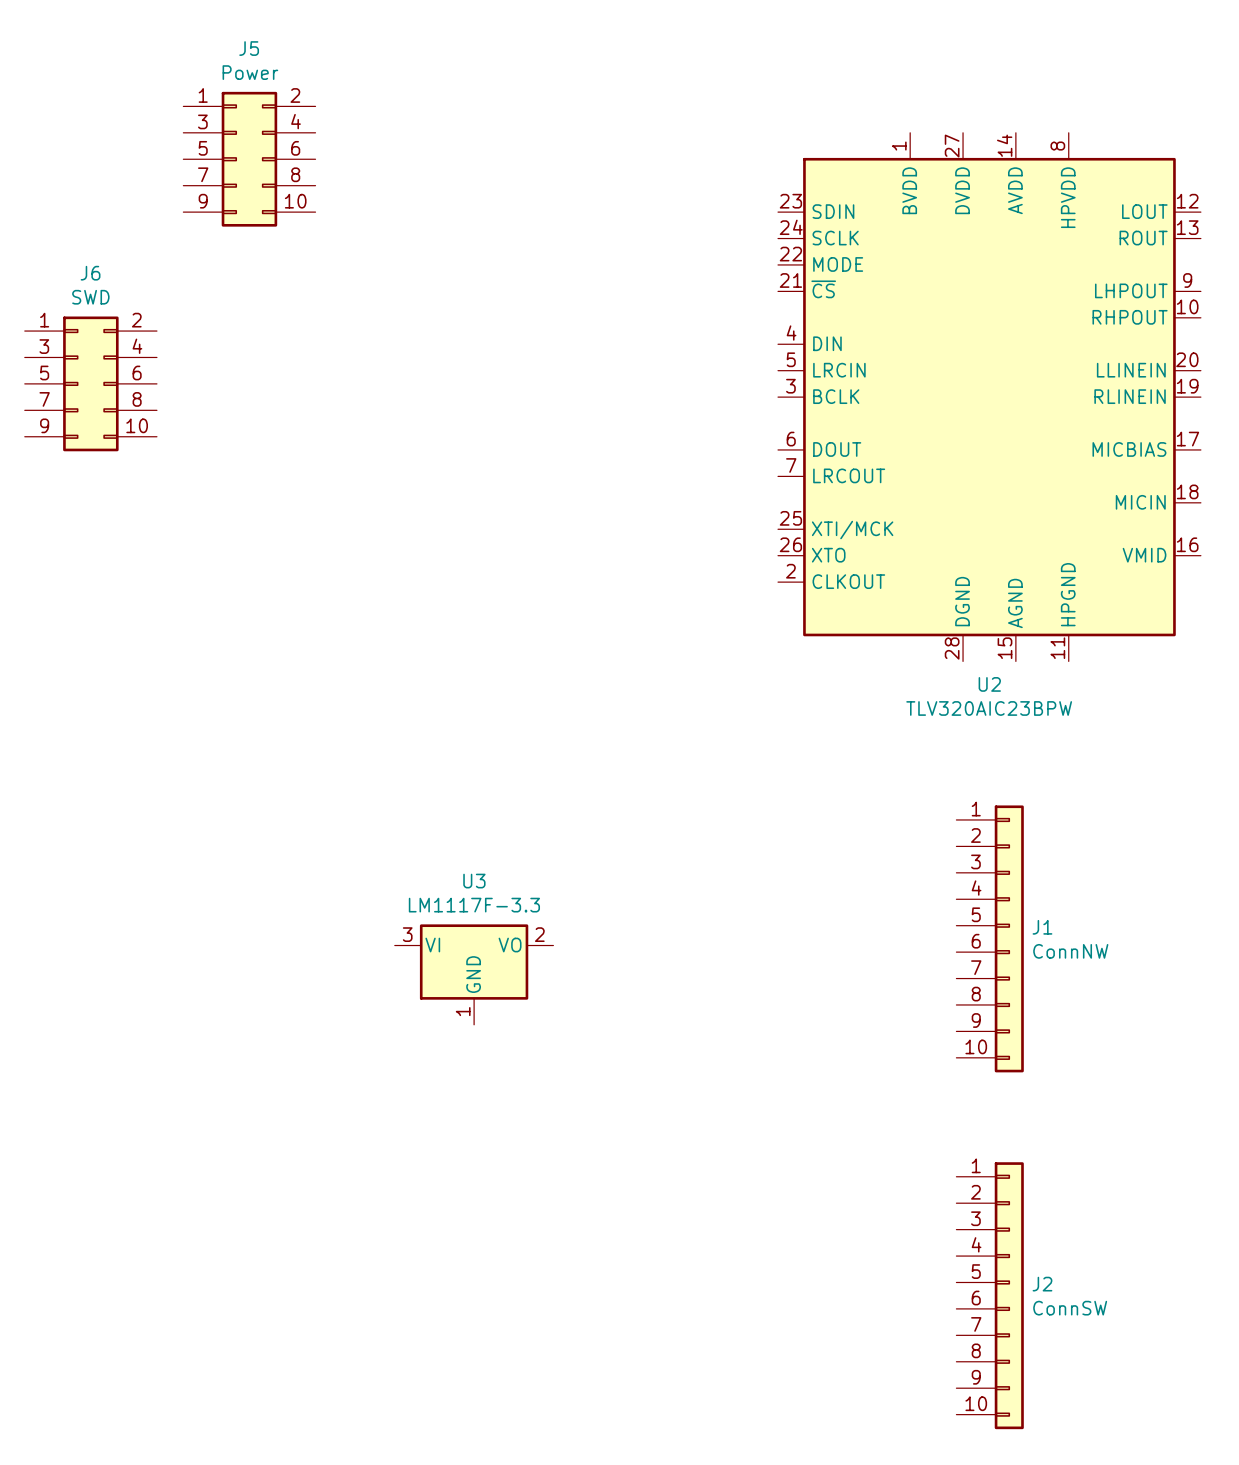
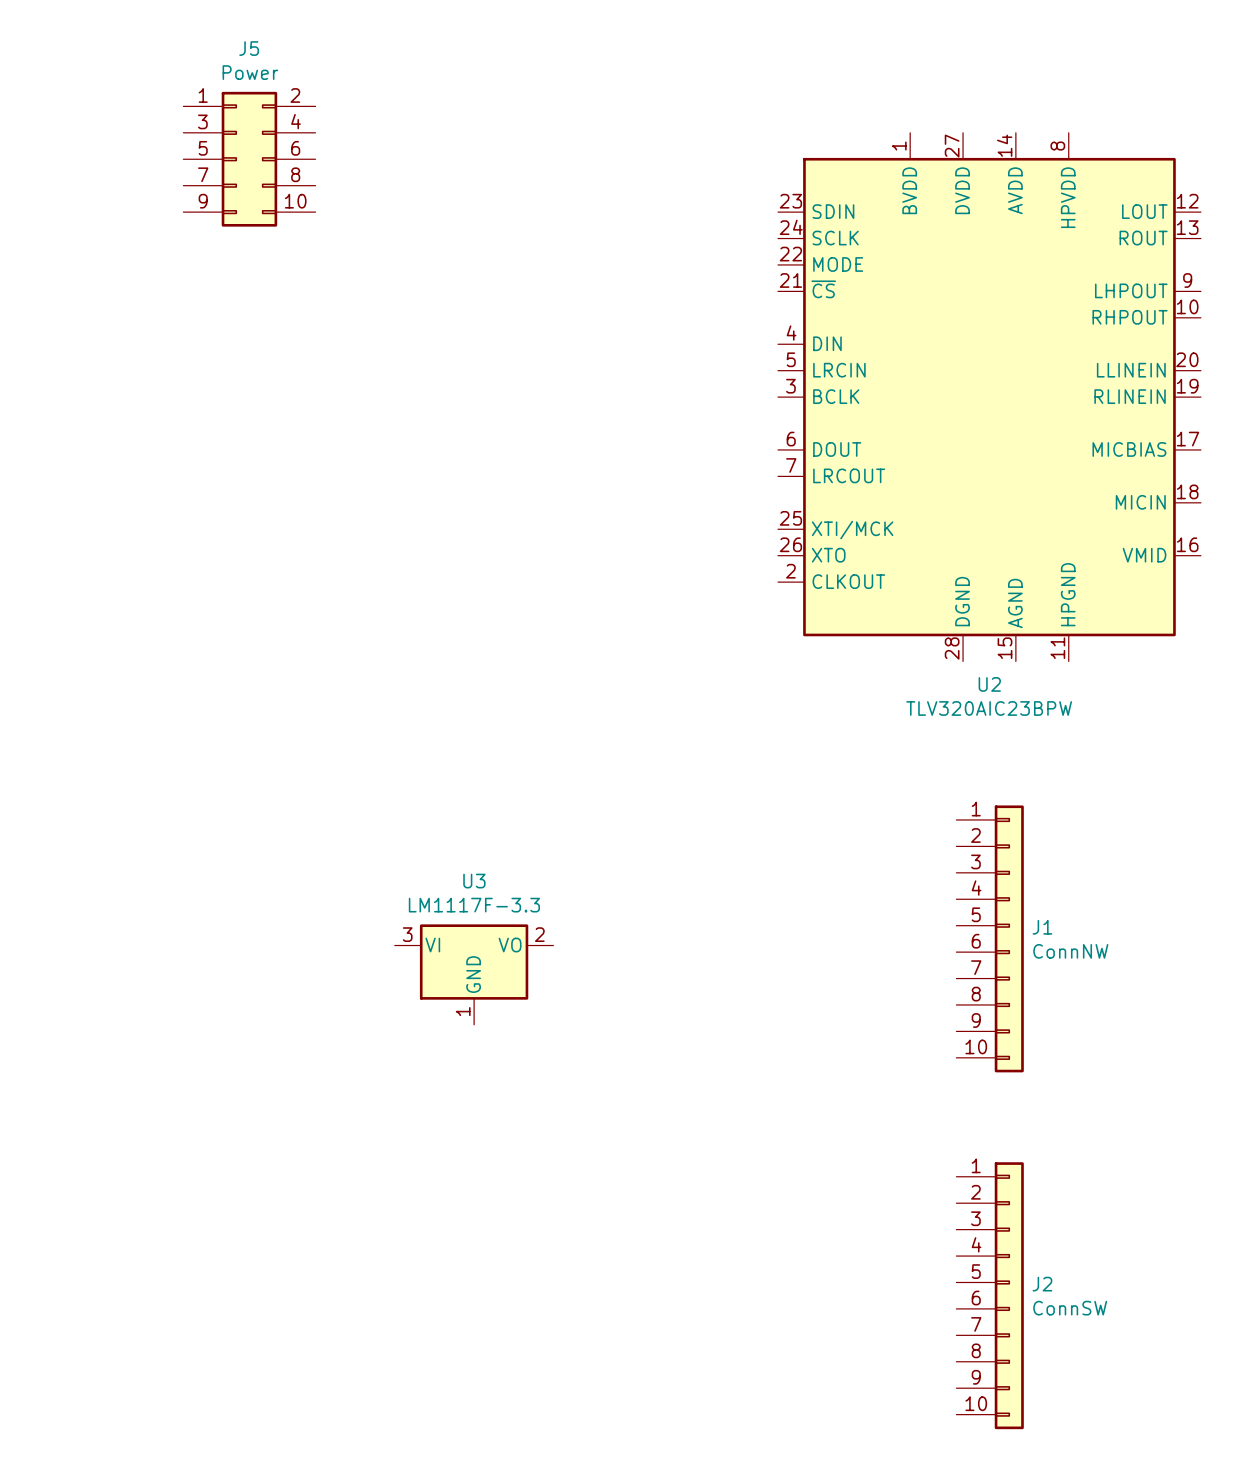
J6: SWD (90, 383) -> none

